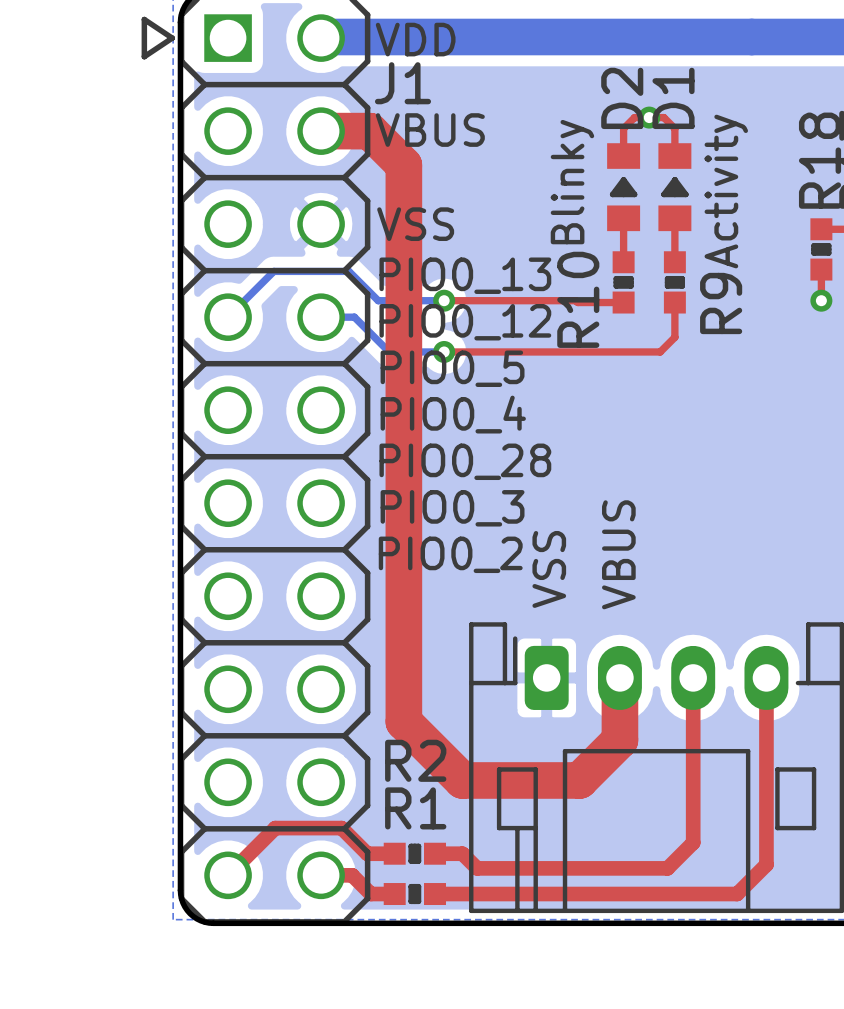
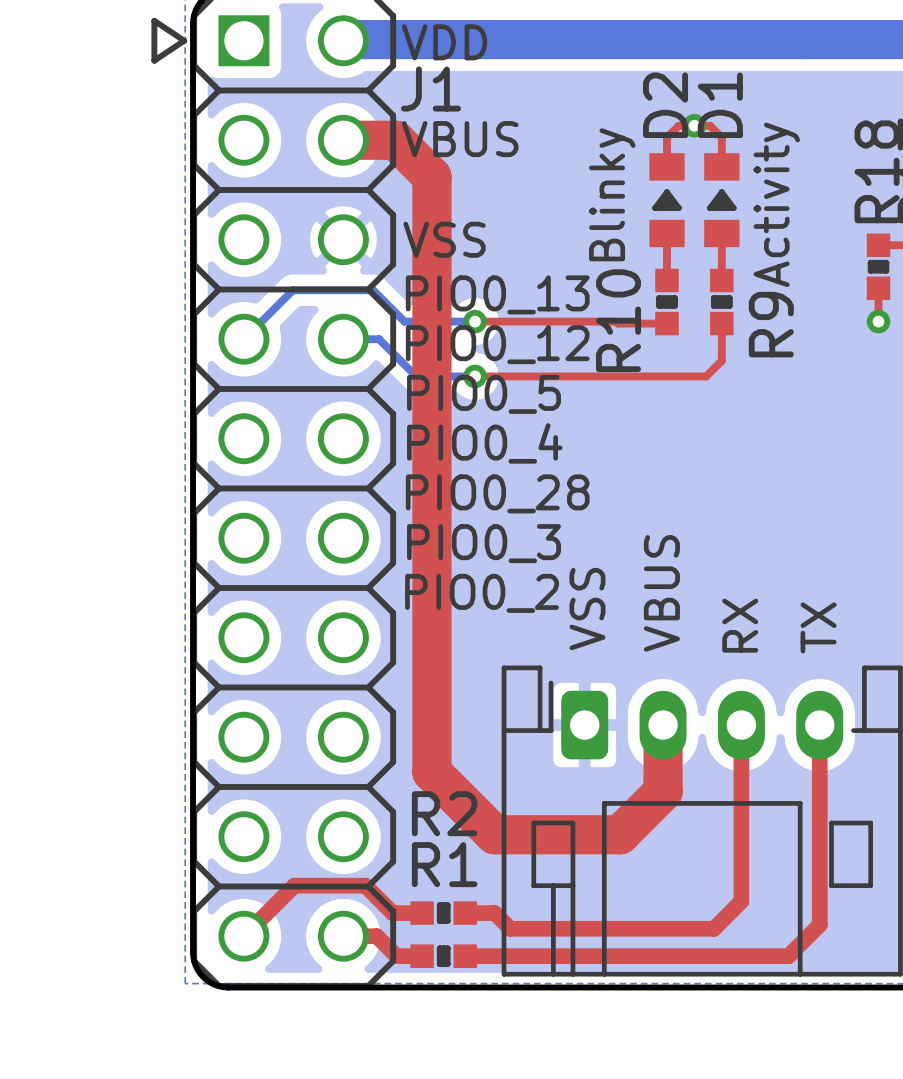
text: none -> RX (740, 625)
text: none -> TX (818, 627)

